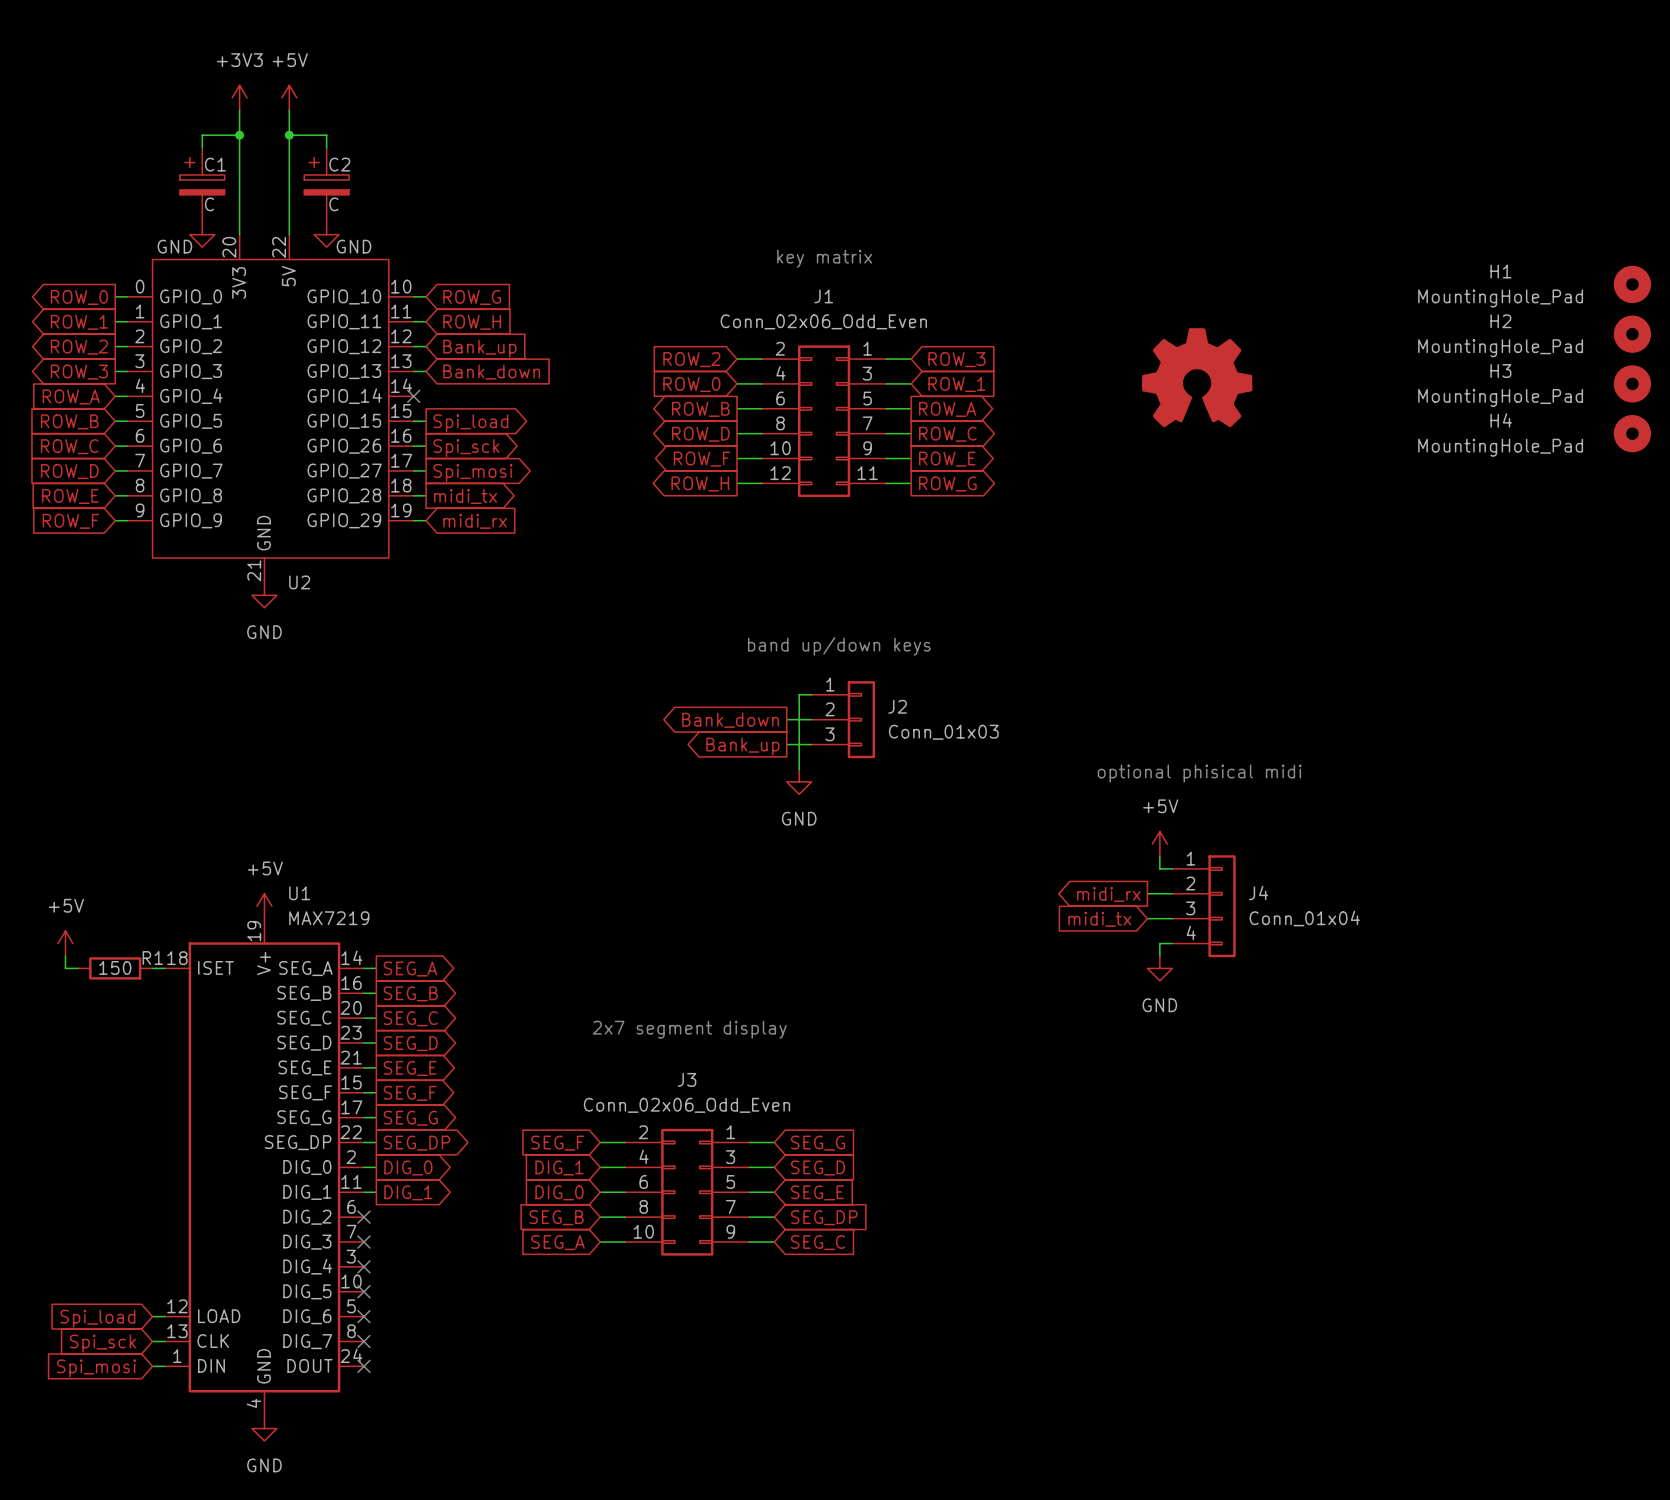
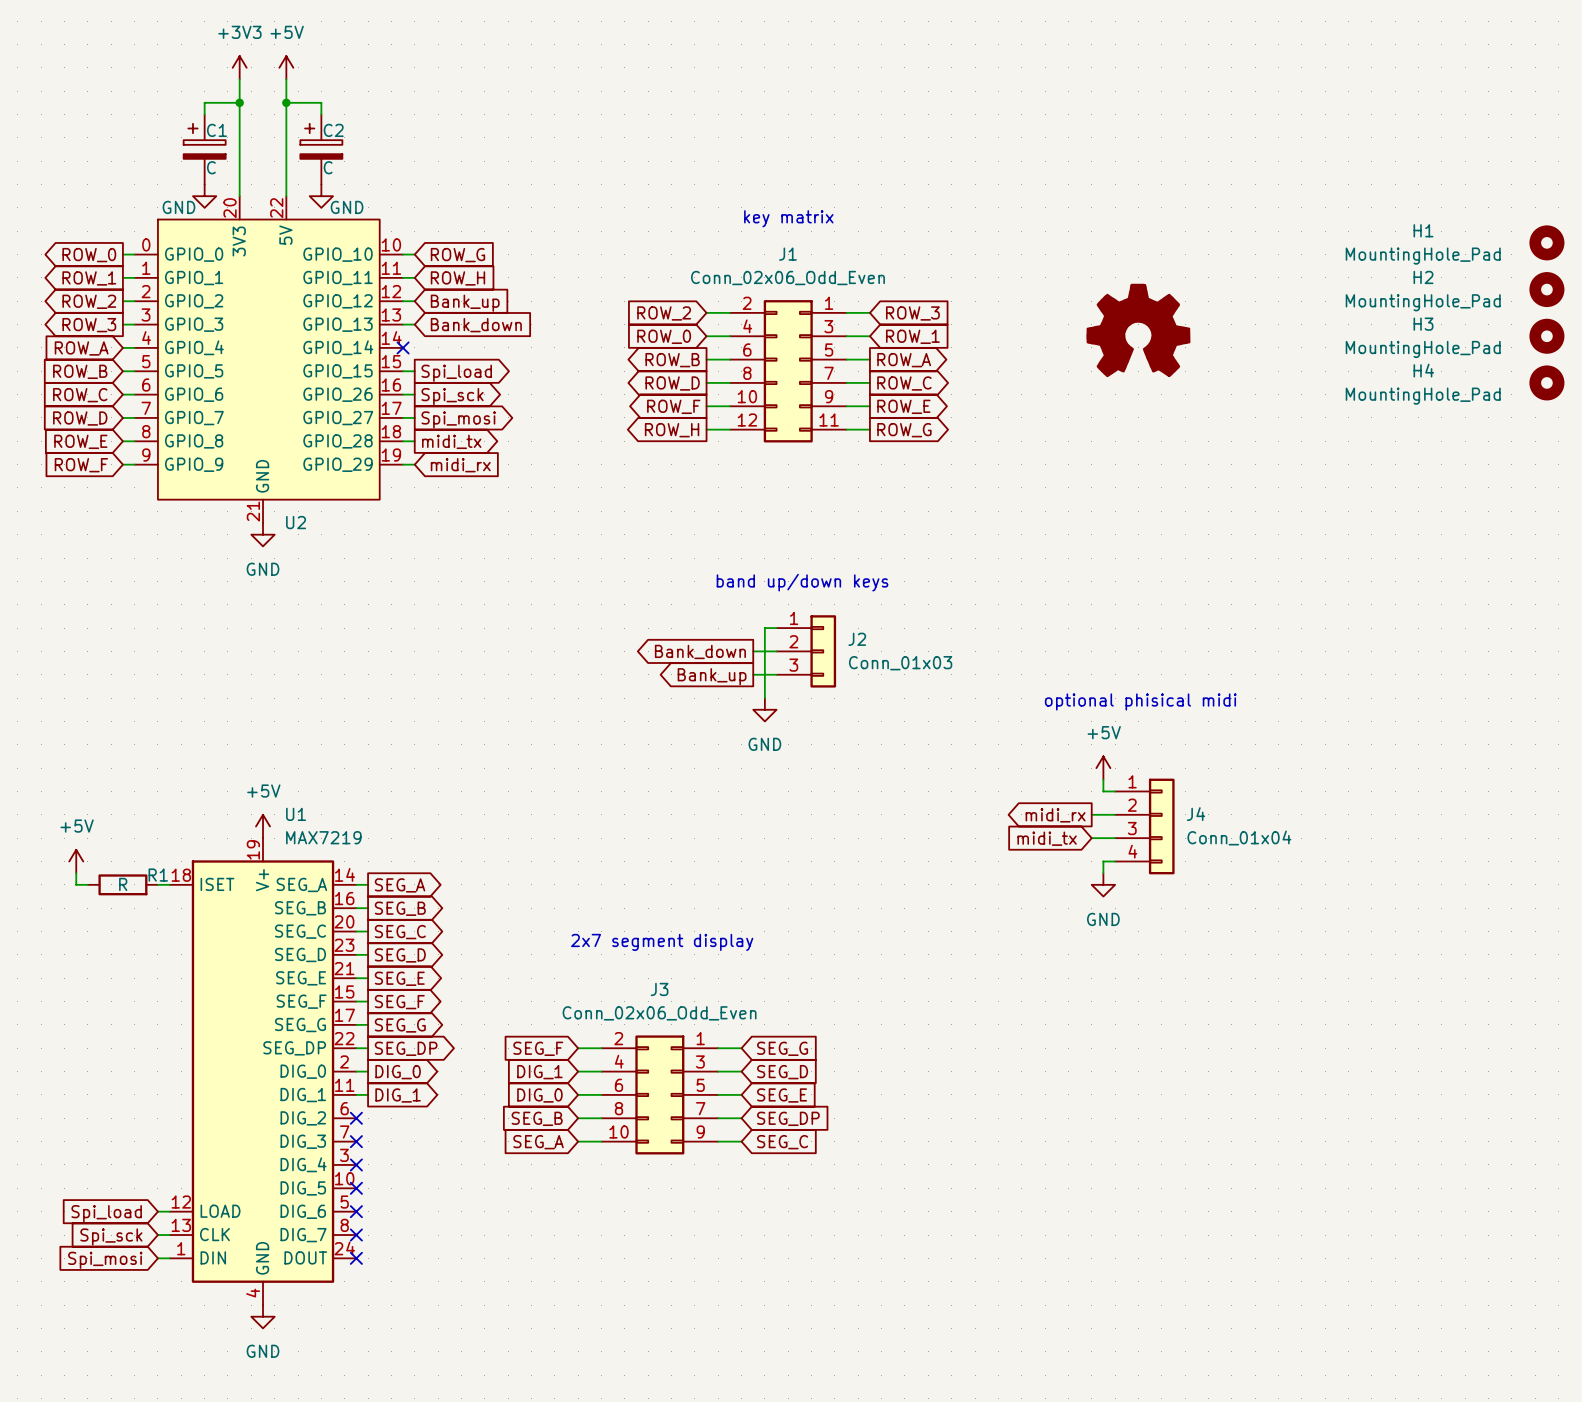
R1 value: 150 (115, 967) -> R (123, 884)

